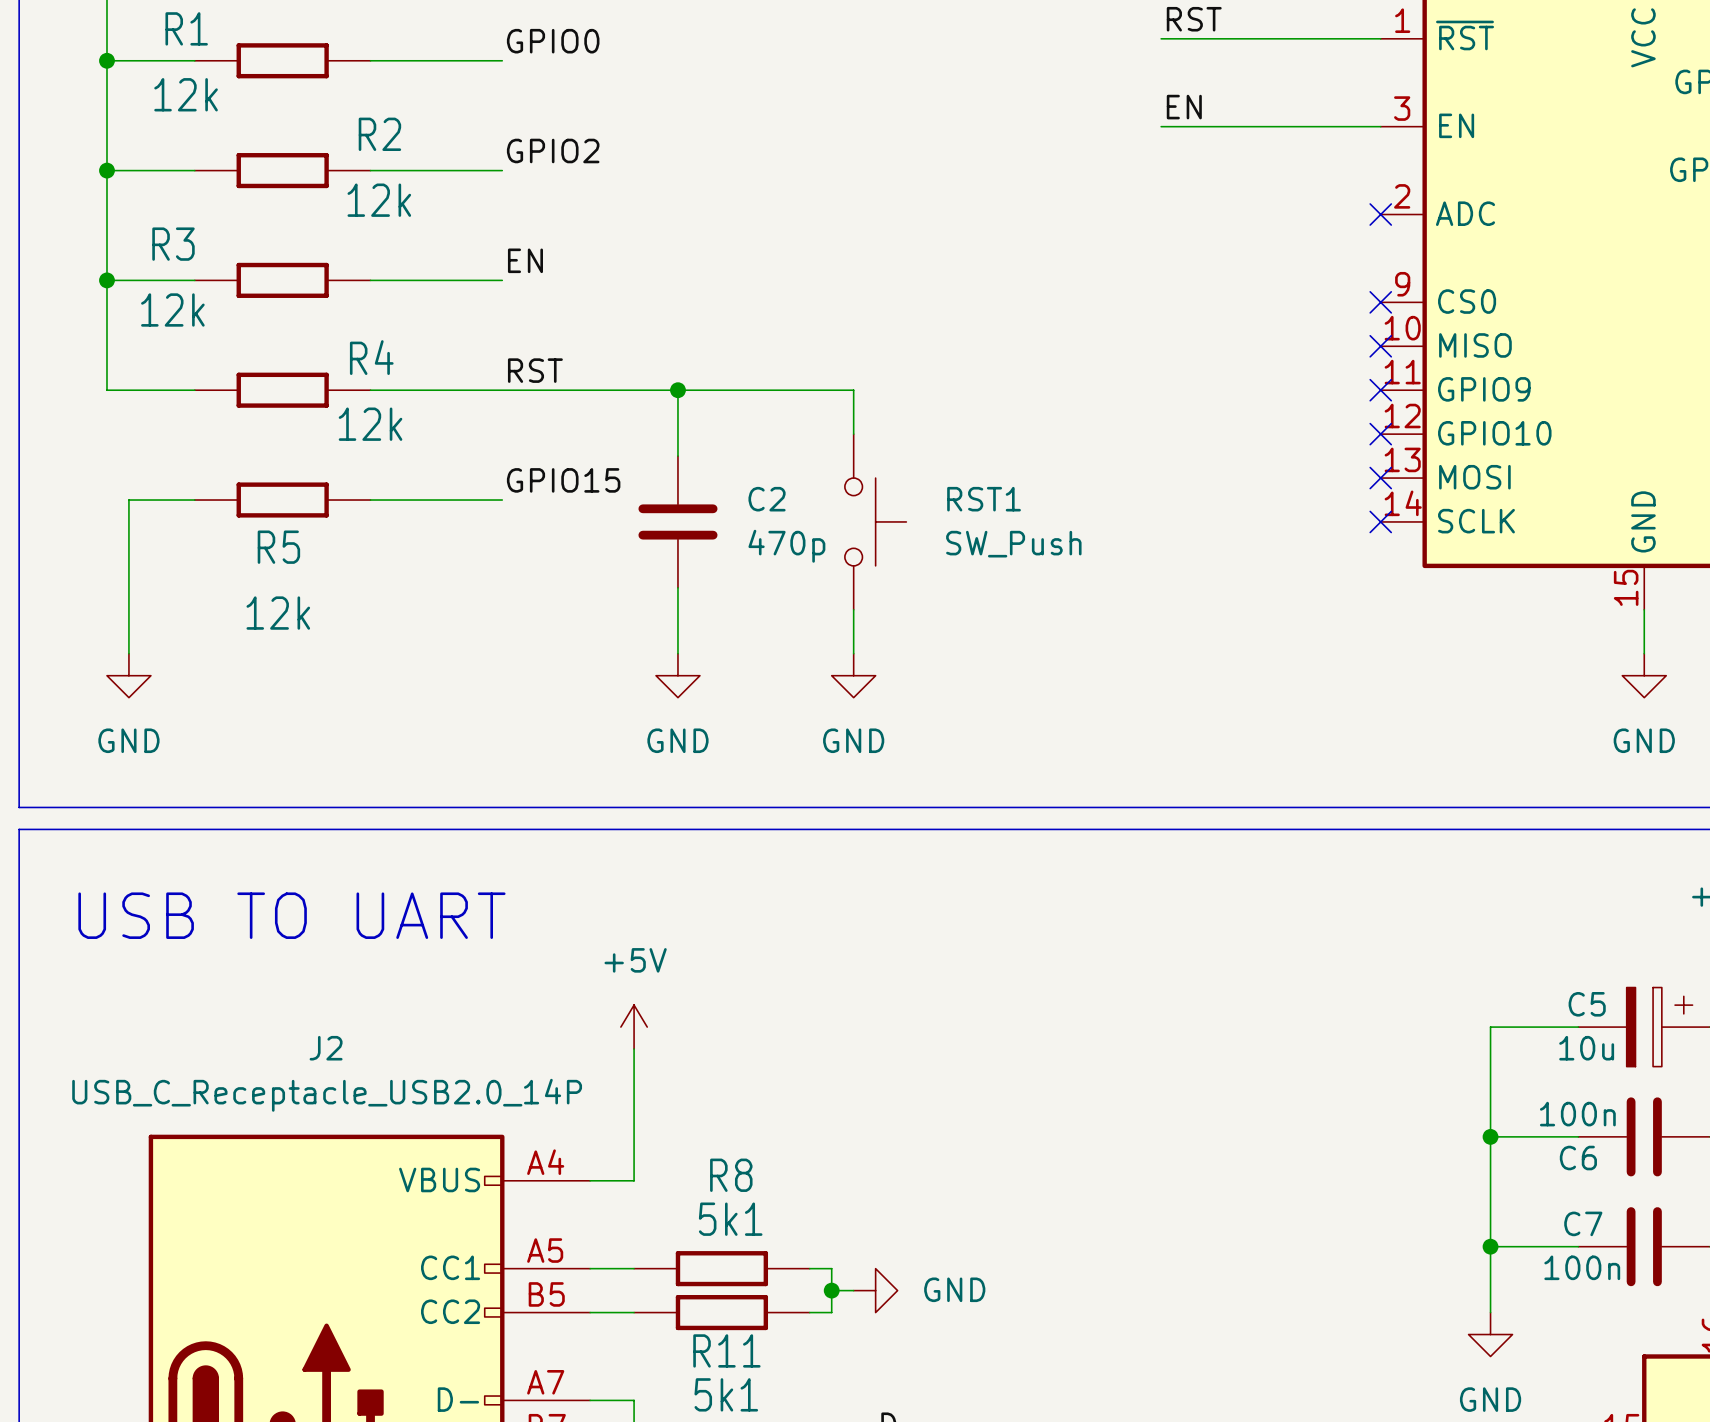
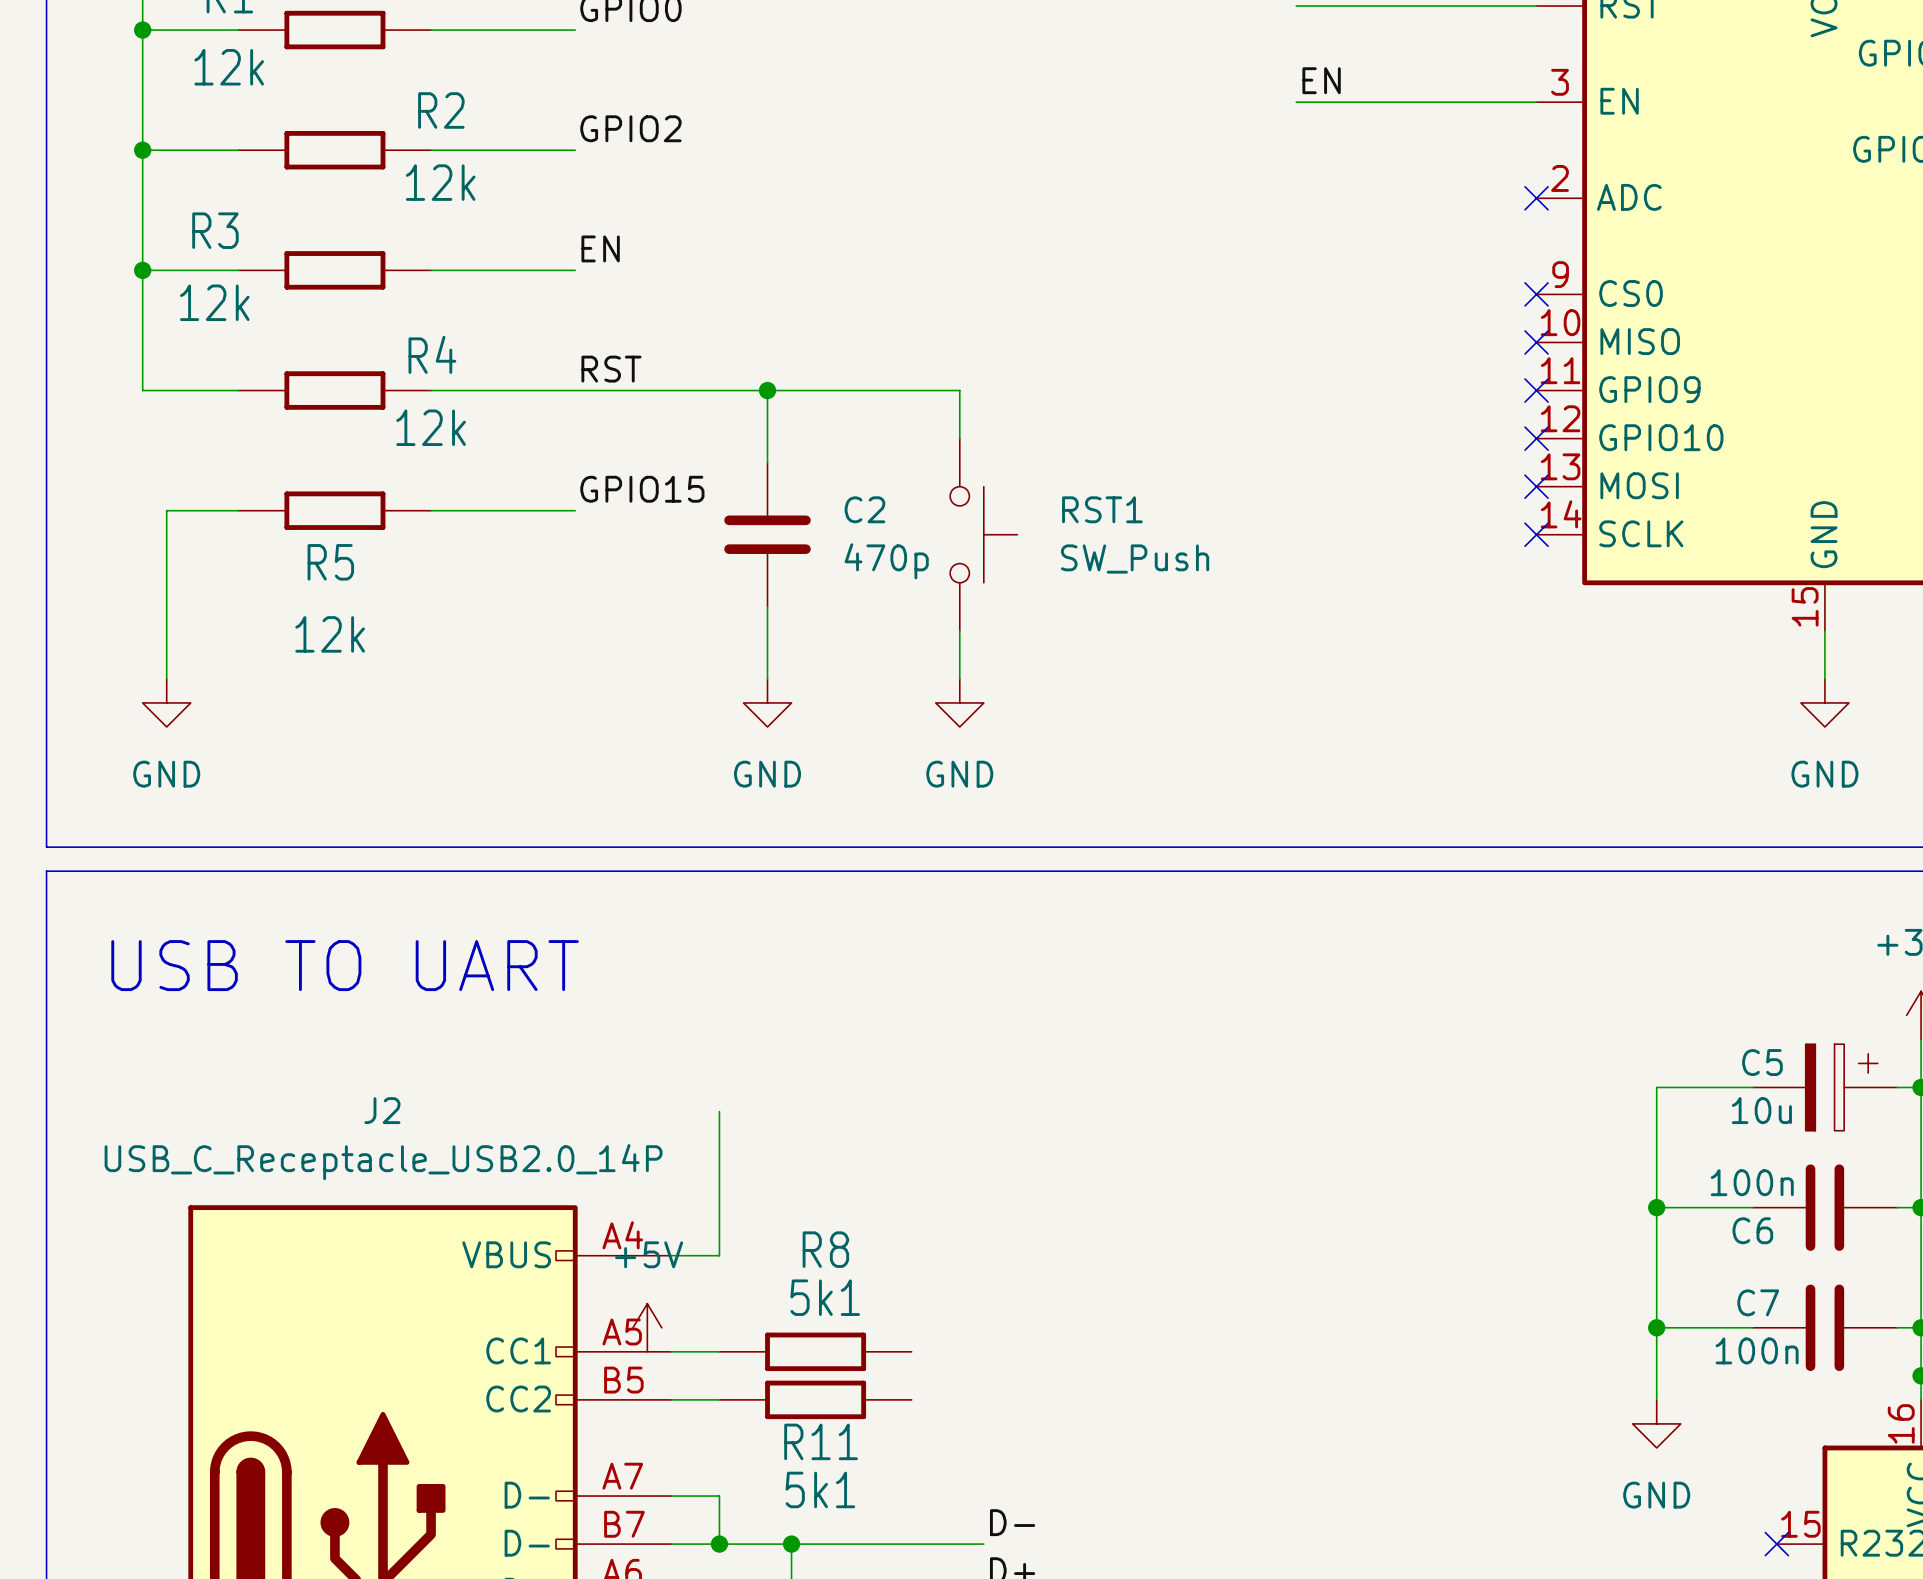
power symbol position: +5V (634, 1027) -> +5V (647, 1327)
wire: (809, 1268) (831, 1268) (831, 1312) (809, 1312) -> none
wire: (831, 1290) (853, 1290) -> none
junction: (831, 1290) -> none
power symbol: GND (875, 1290) -> none

